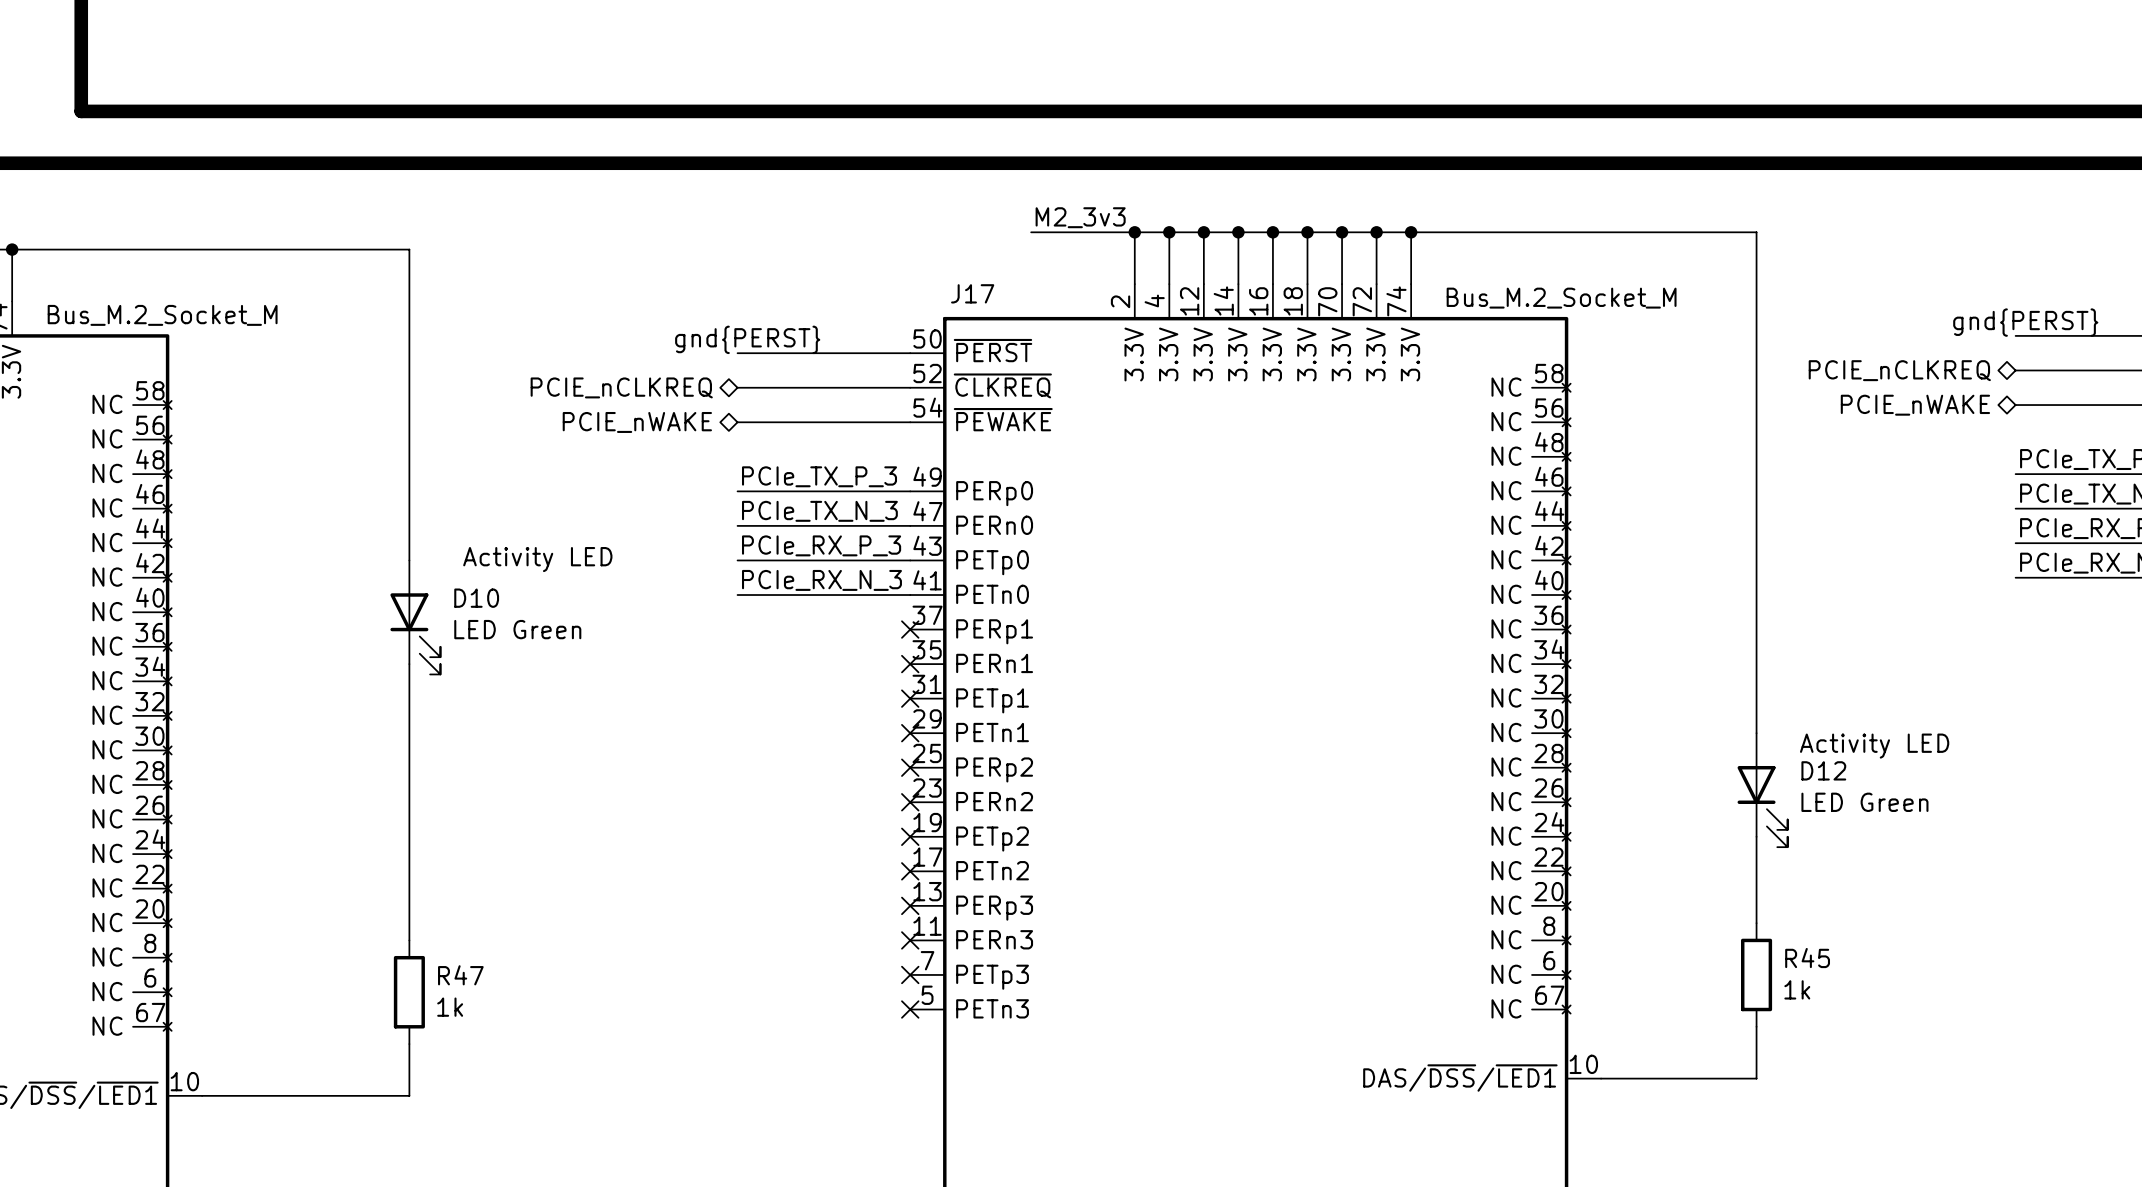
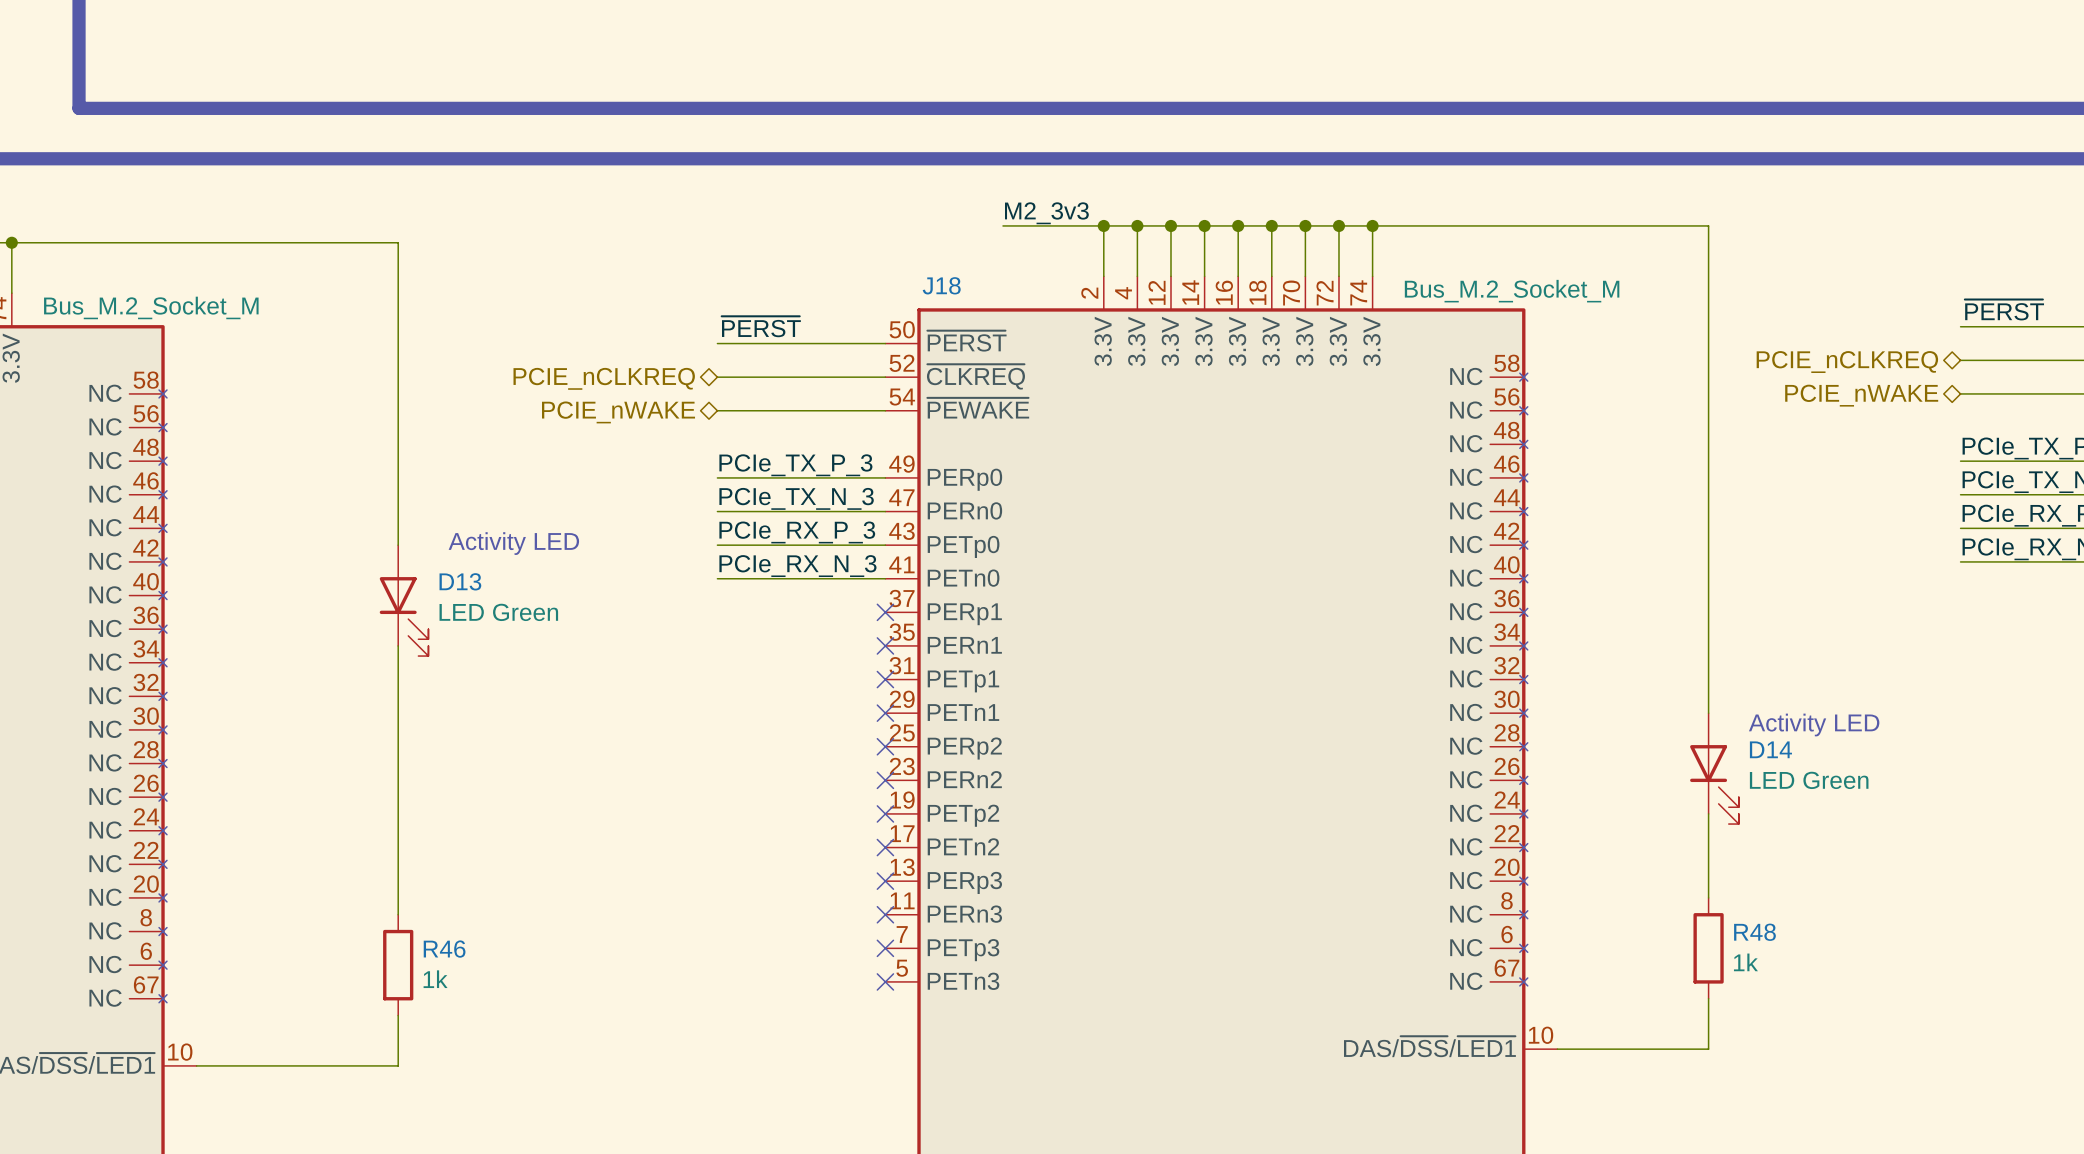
J17 name: J17 (972, 293) -> J18 (941, 285)
label: gnd{PERST} (2025, 322) -> ~{PERST} (2004, 309)
label: gnd{PERST} (747, 339) -> ~{PERST} (761, 326)
D10 name: D10 (476, 598) -> D13 (460, 581)
D12 name: D12 (1823, 770) -> D14 (1770, 749)
R45 name: R45 (1807, 958) -> R48 (1754, 932)
R47 name: R47 (460, 975) -> R46 (444, 949)

